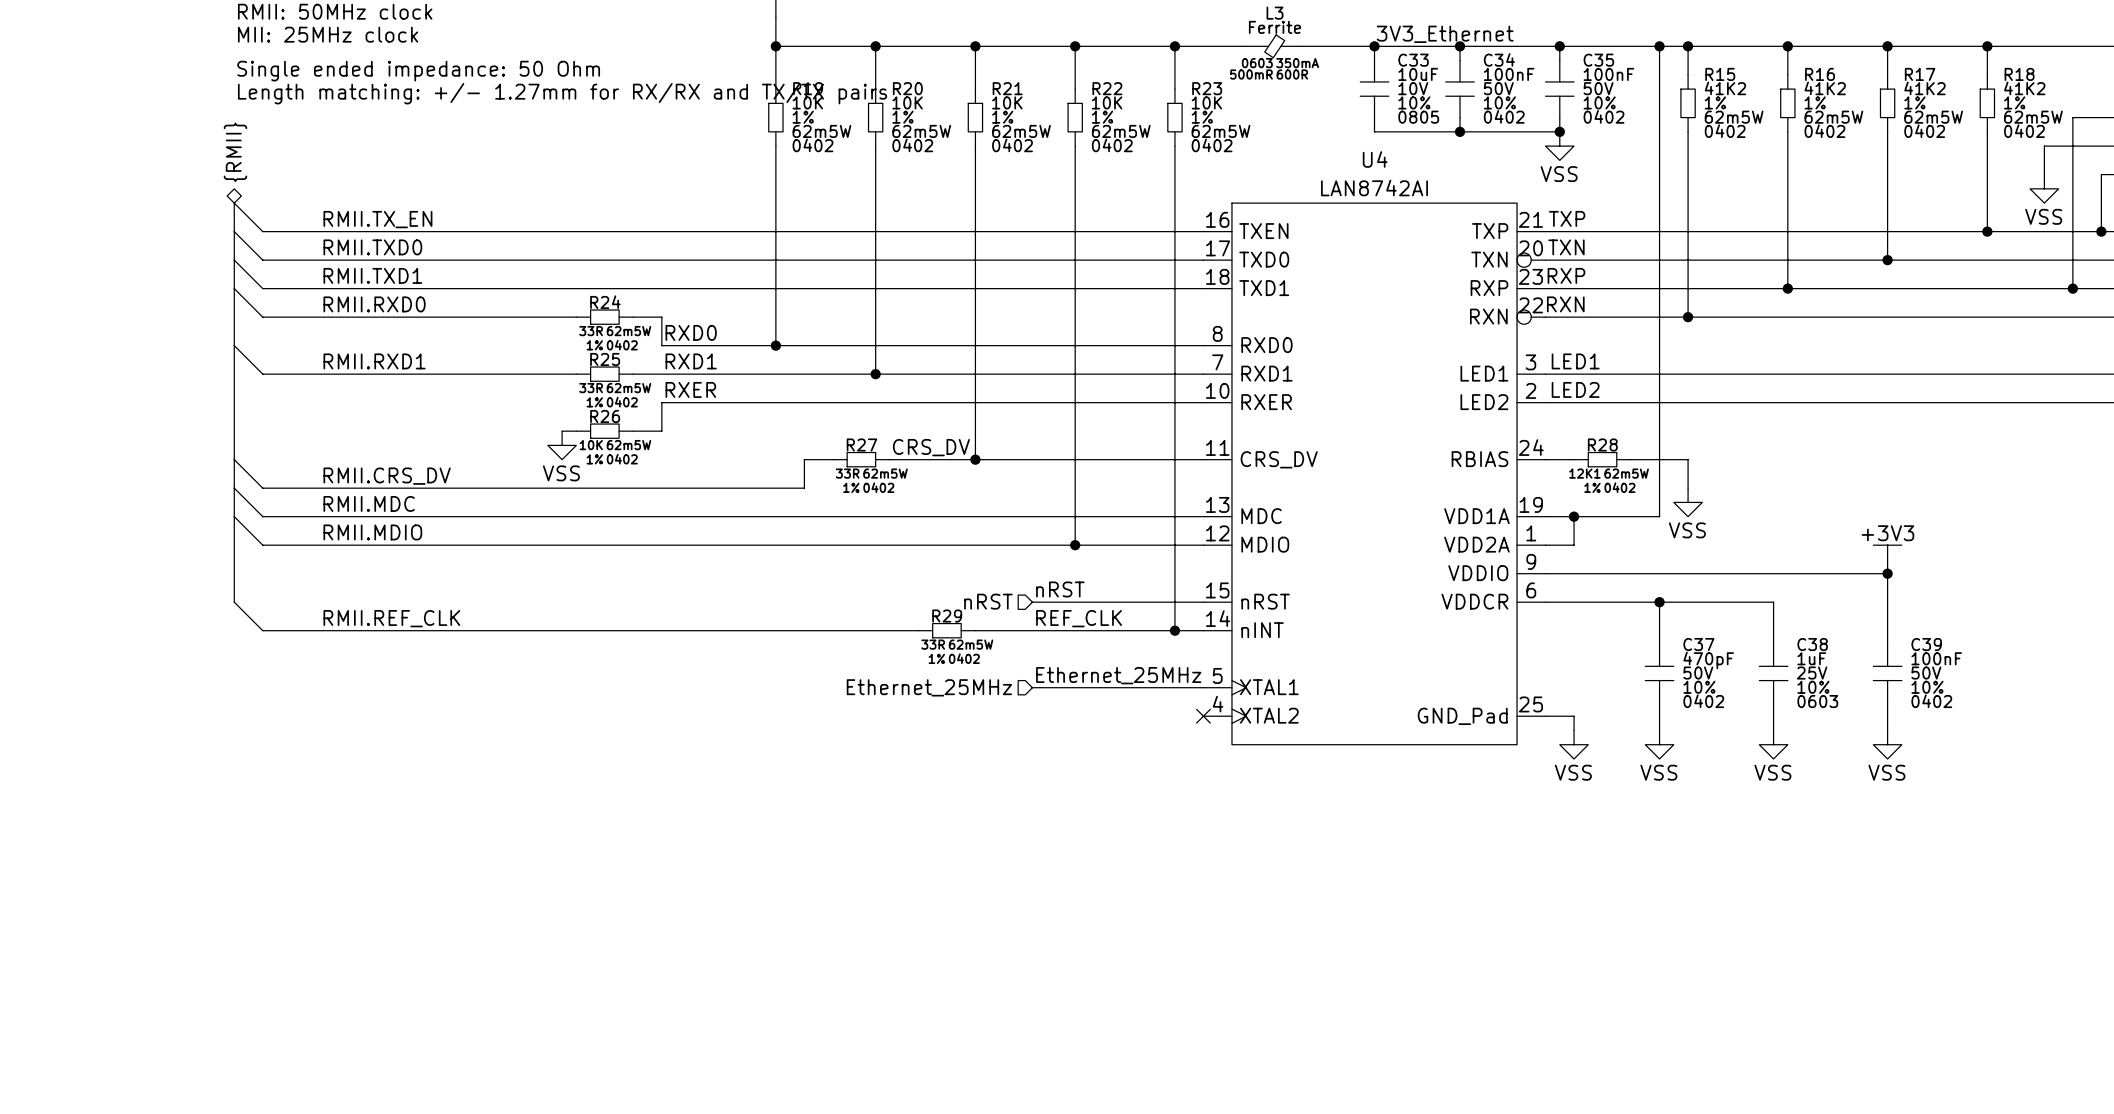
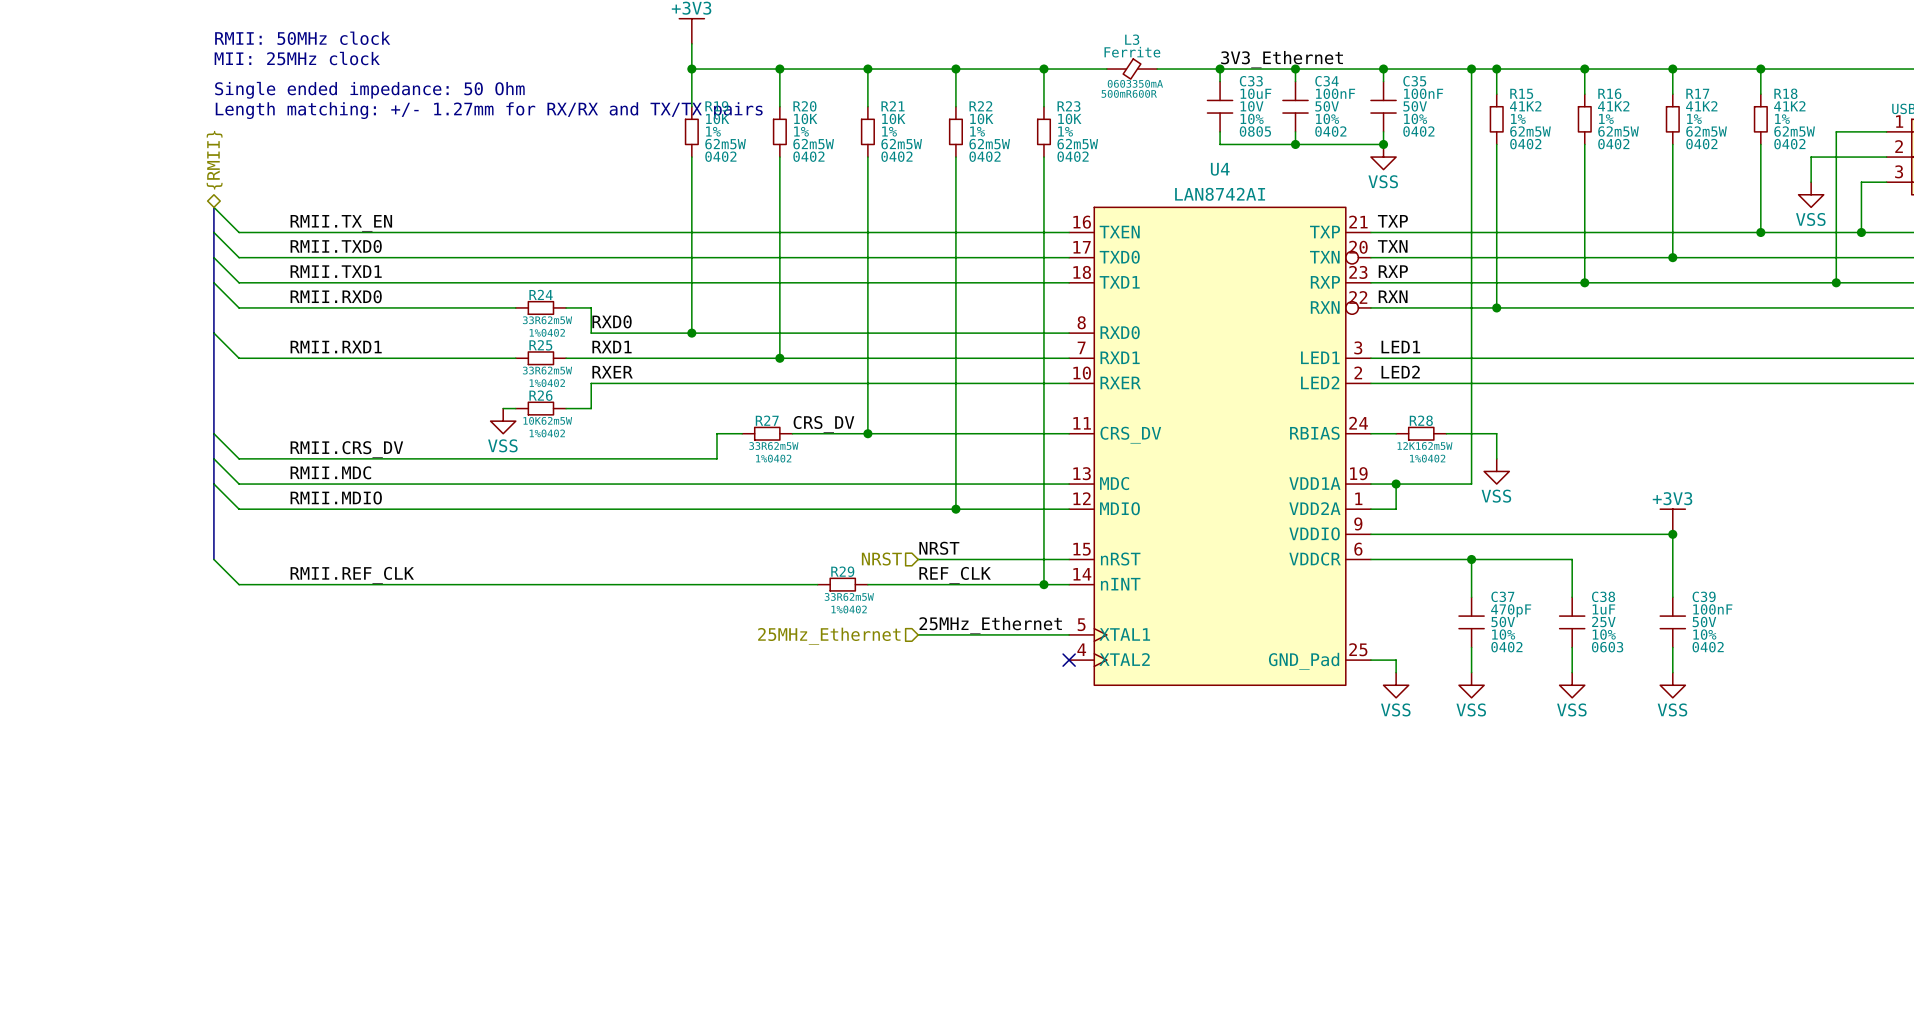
label: nRST (1060, 589) -> NRST (939, 548)
hierarchical label: nRST (988, 601) -> NRST (881, 559)
label: Ethernet_25MHz (1118, 675) -> 25MHz_Ethernet (990, 625)
hierarchical label: Ethernet_25MHz (929, 687) -> 25MHz_Ethernet (829, 636)

